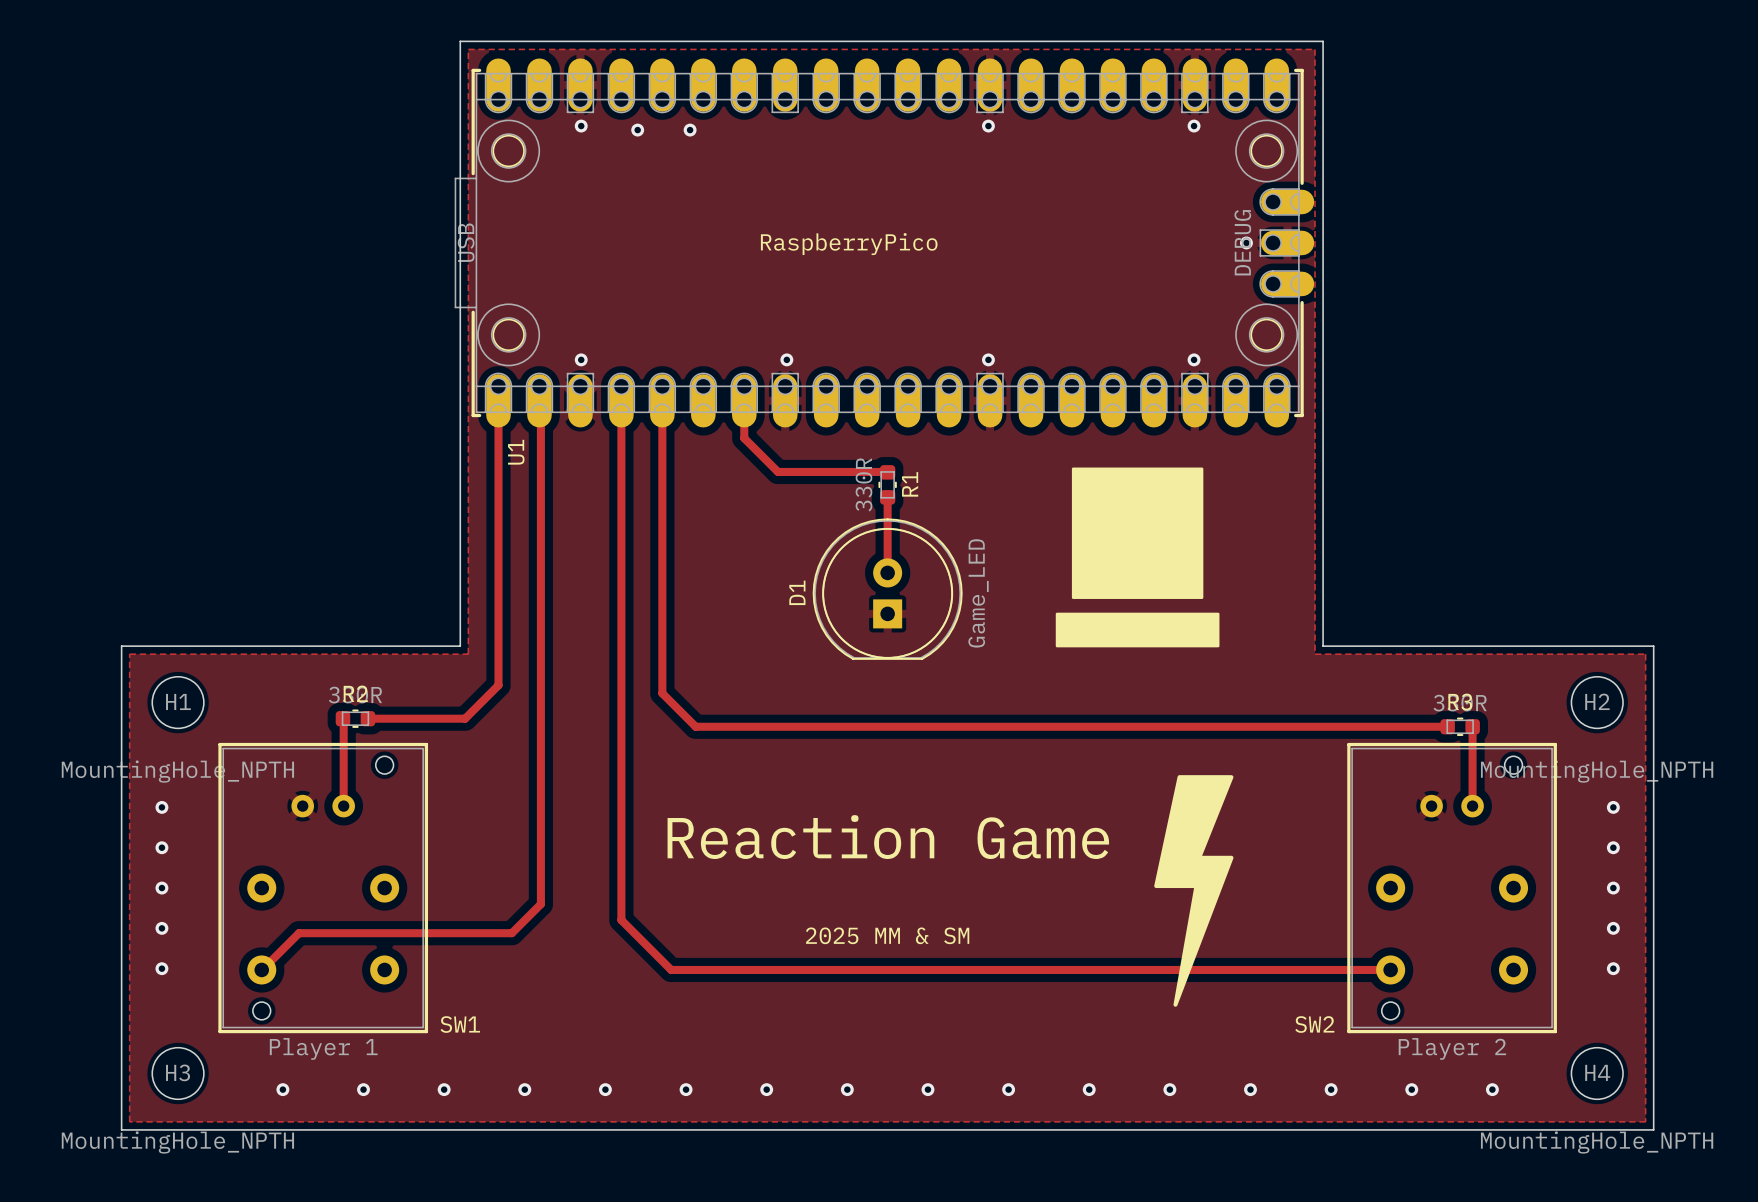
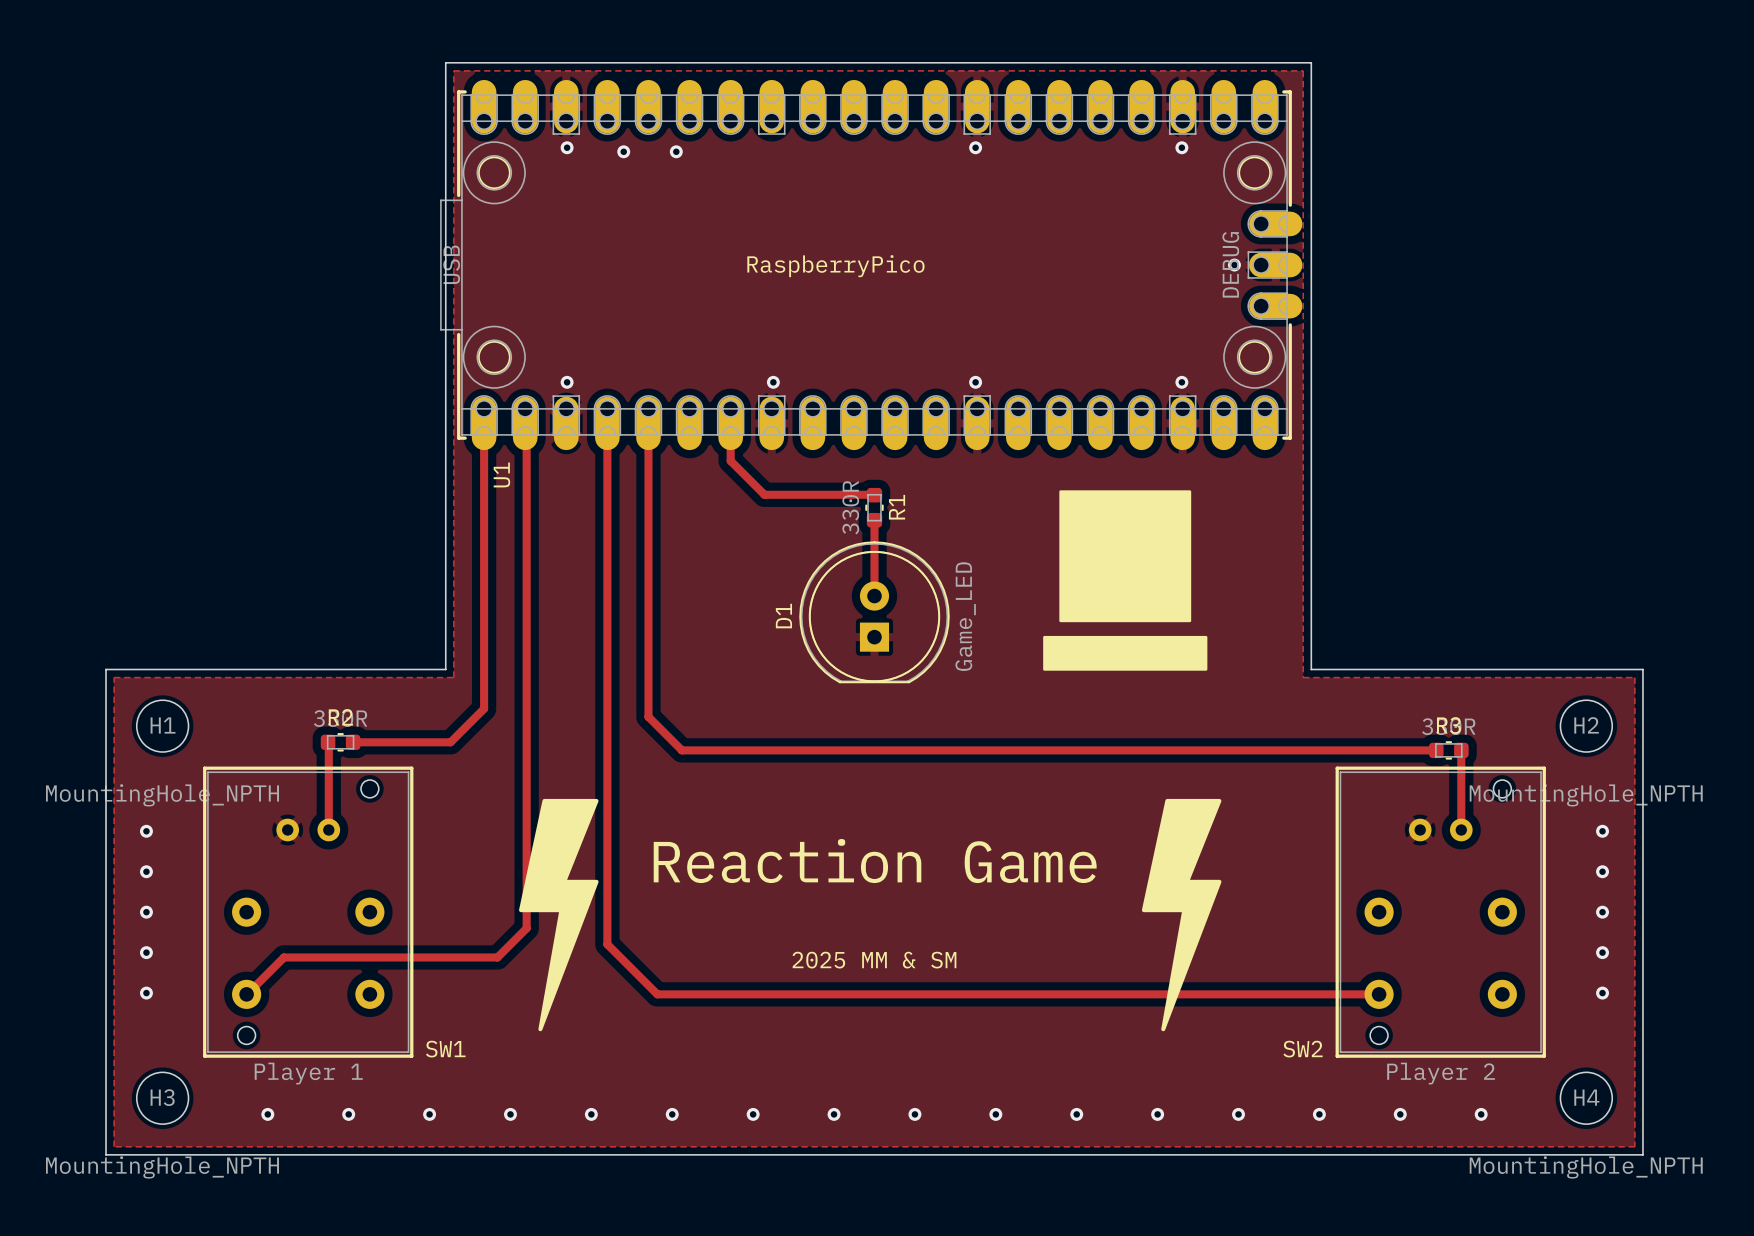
drawing: none -> [519, 798, 599, 1032]

